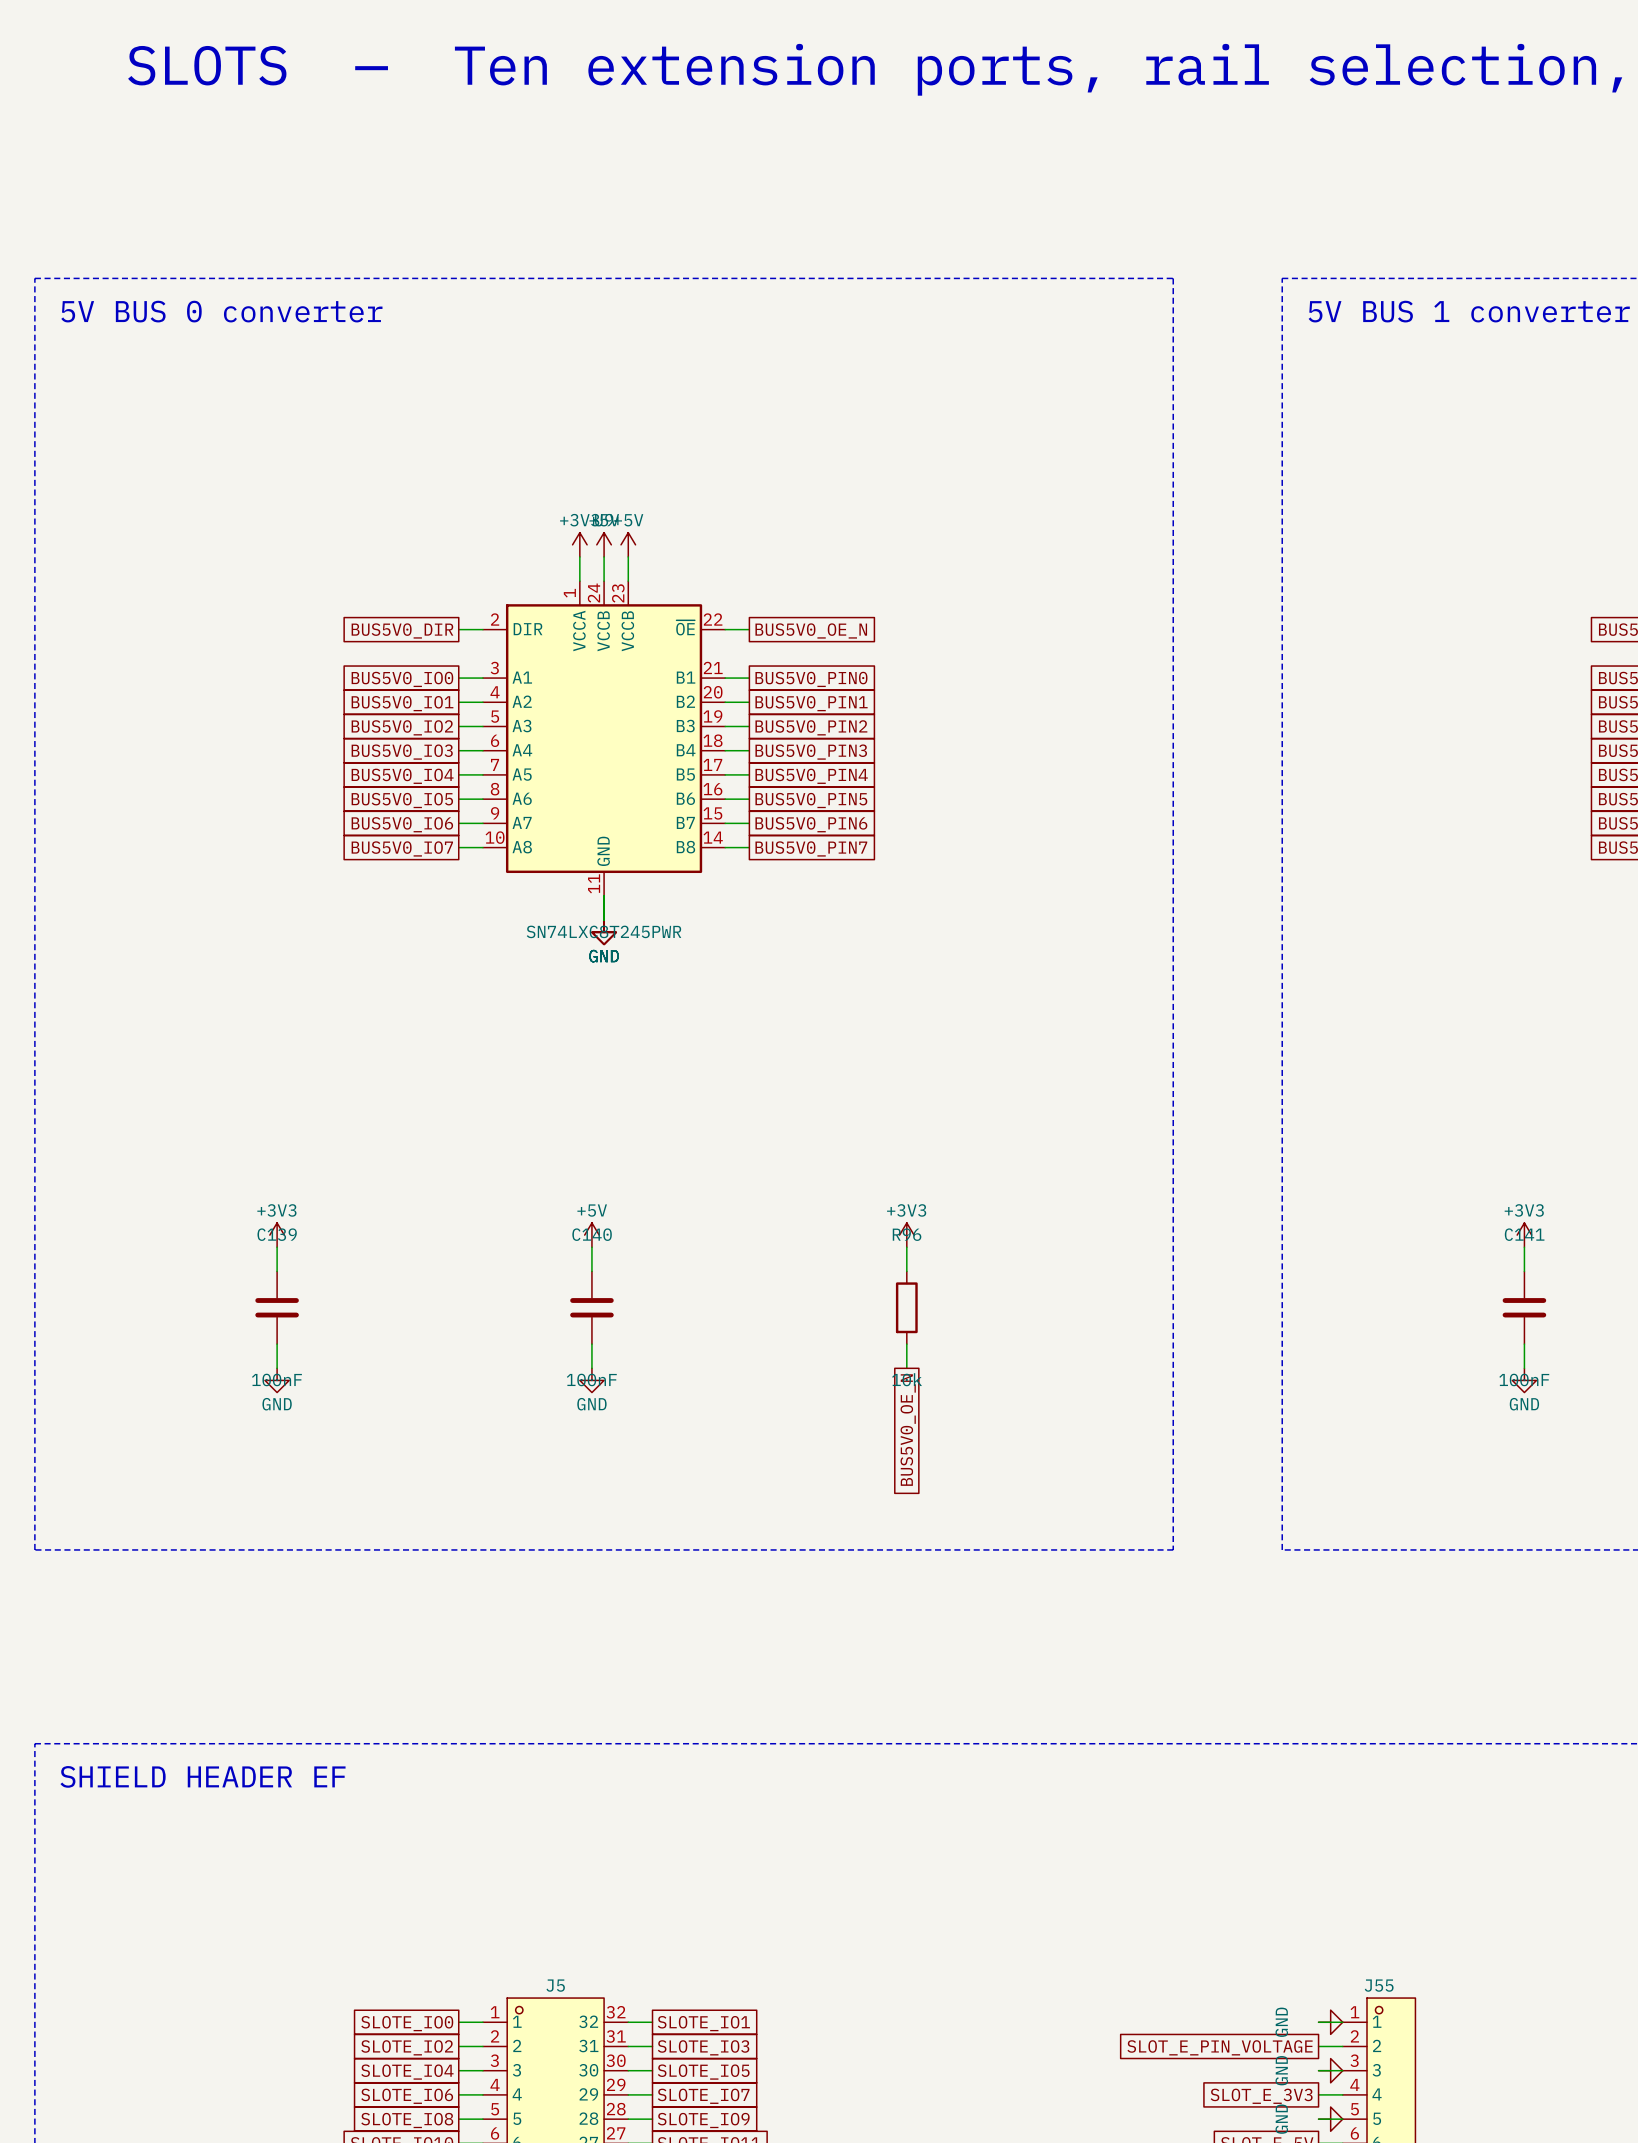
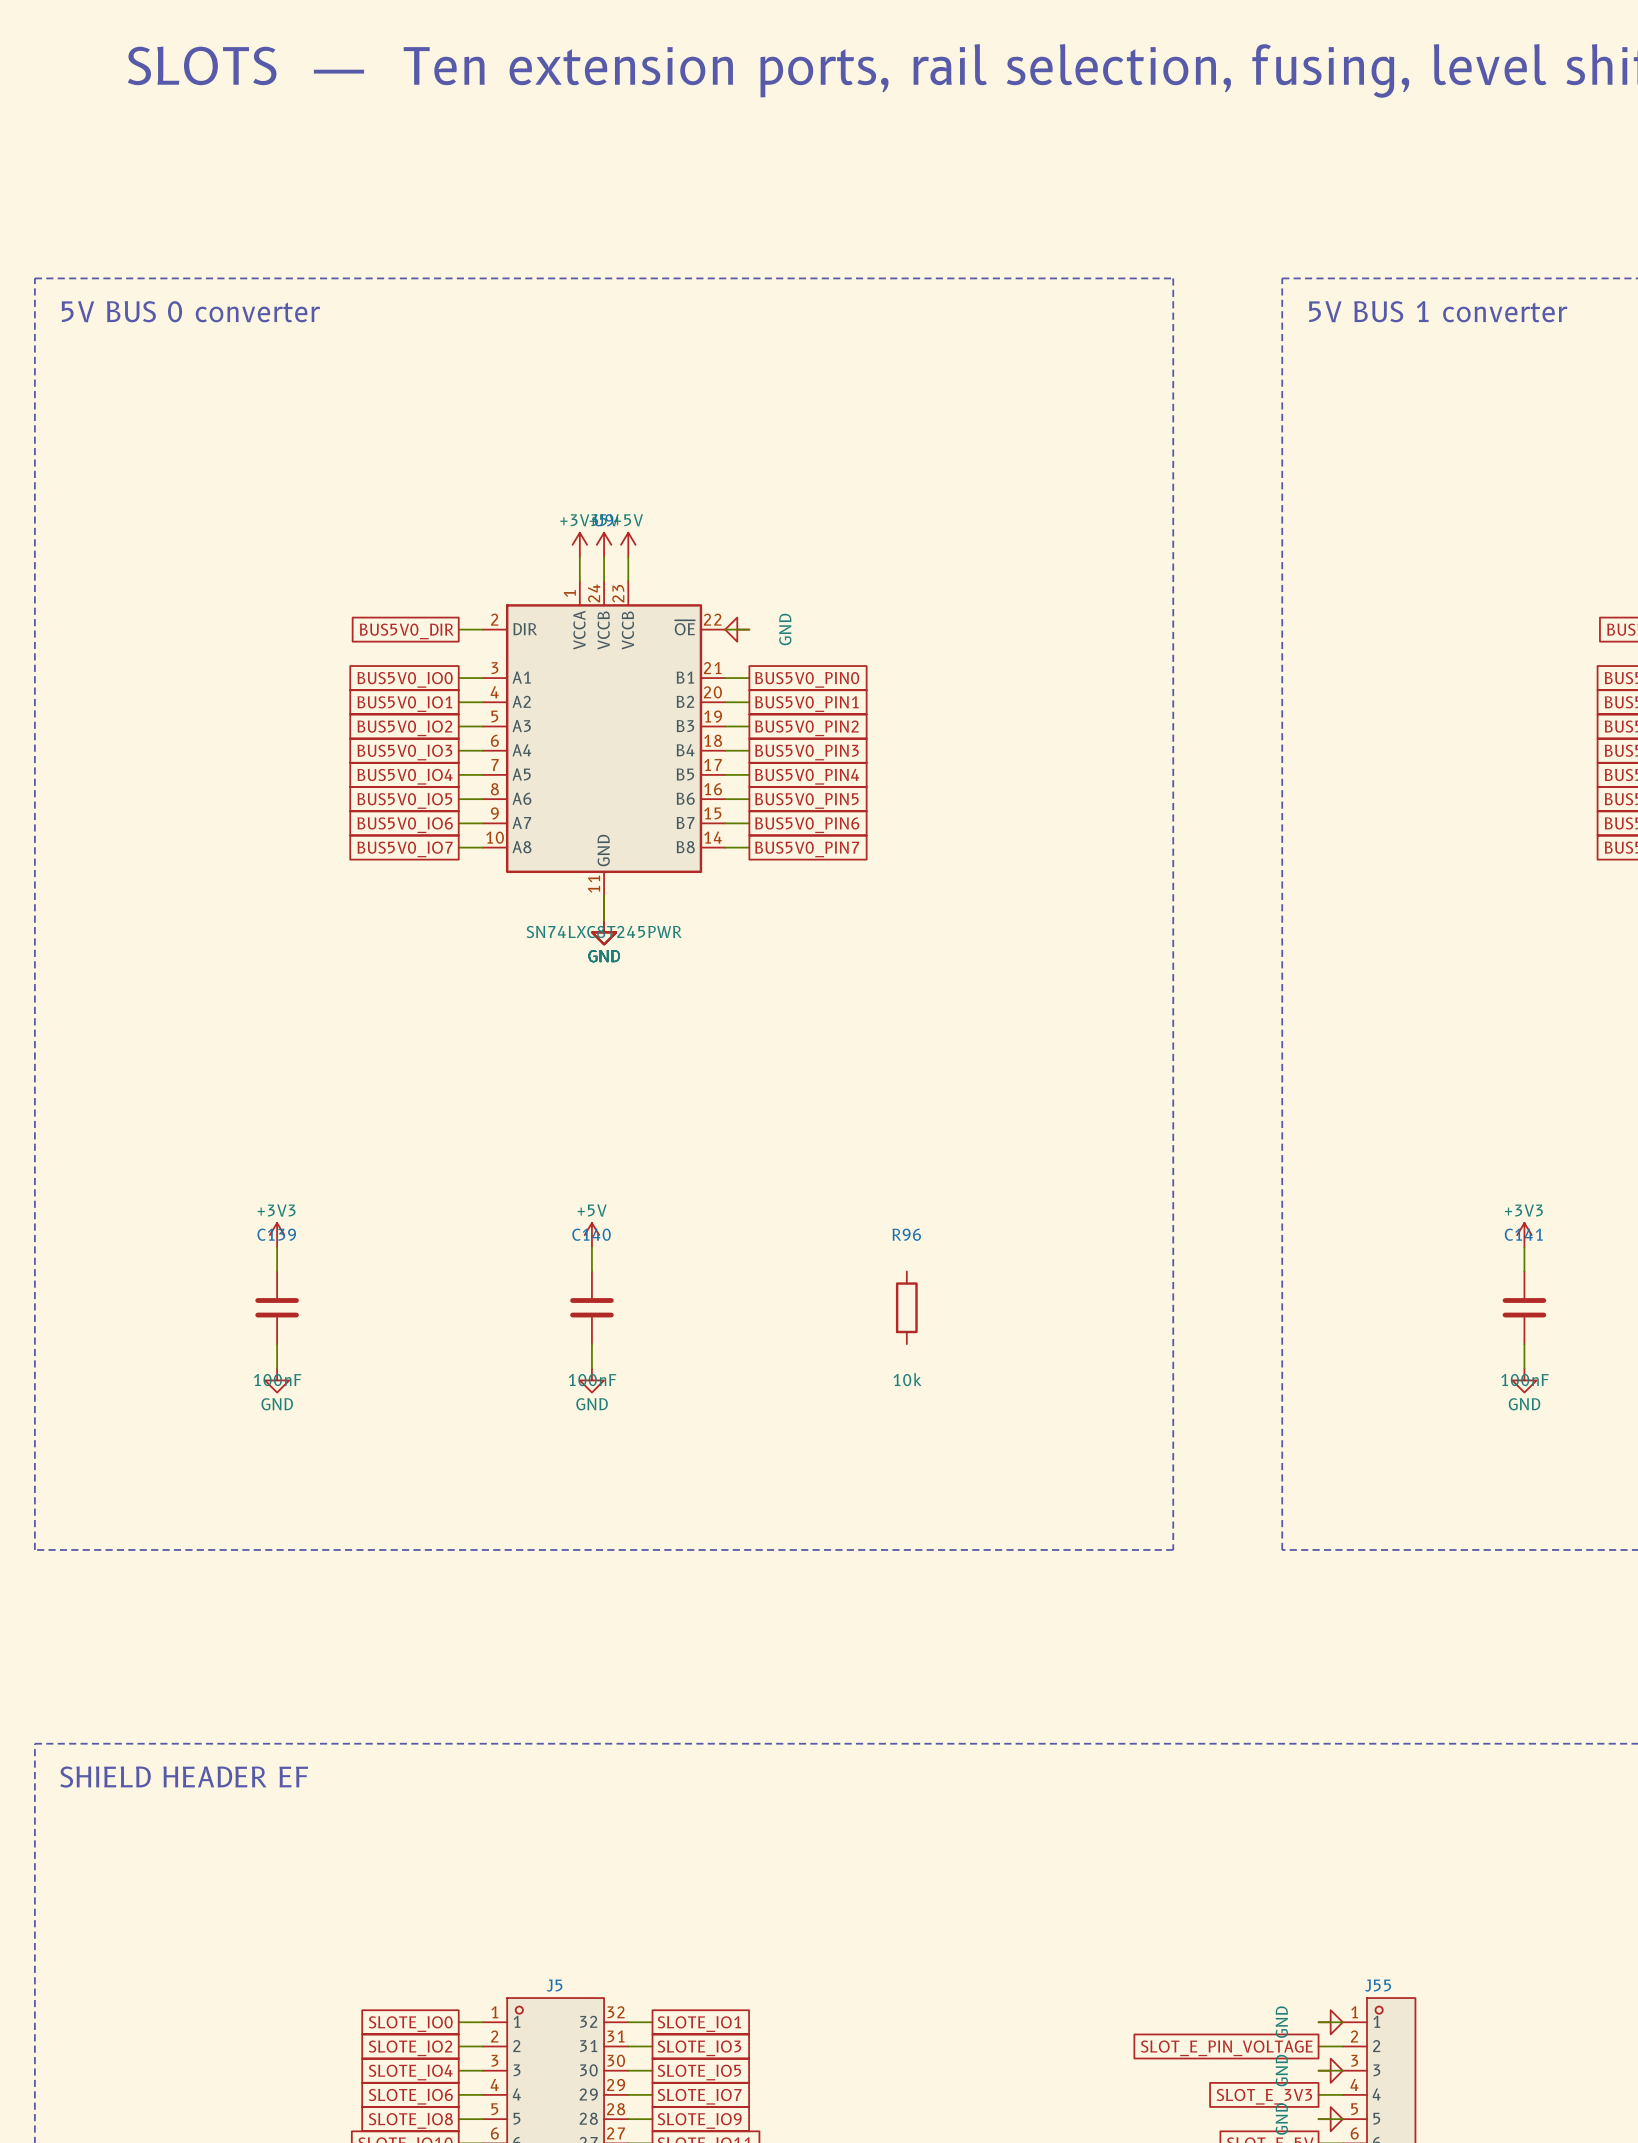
power symbol: none -> GND (737, 629)
global label: BUS5V0_OE_N (811, 630) -> none
power symbol: +3V3 (906, 1235) -> none
wire: (906, 1247) (906, 1271) -> none
wire: (906, 1344) (906, 1368) -> none
global label: BUS5V0_OE_N (908, 1430) -> none

